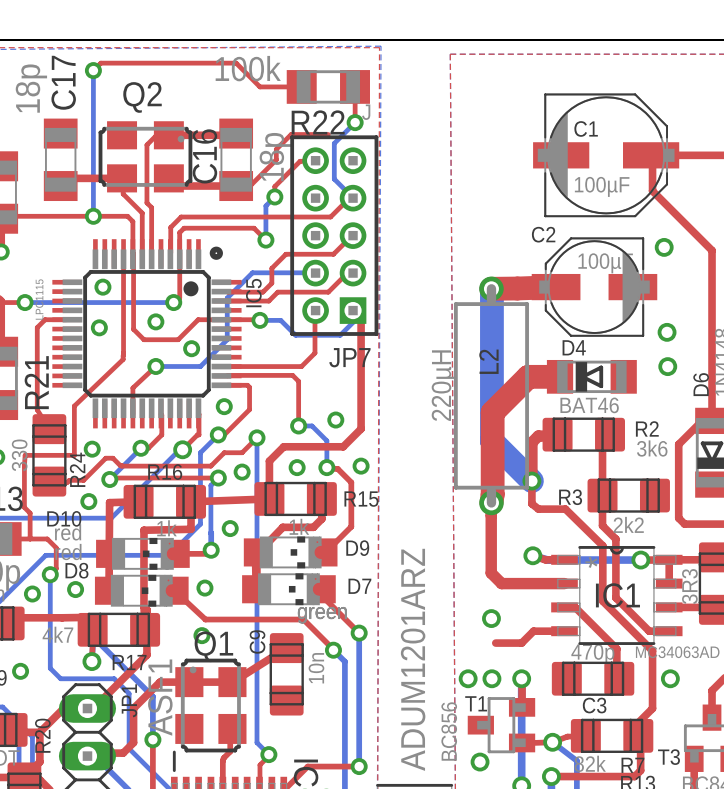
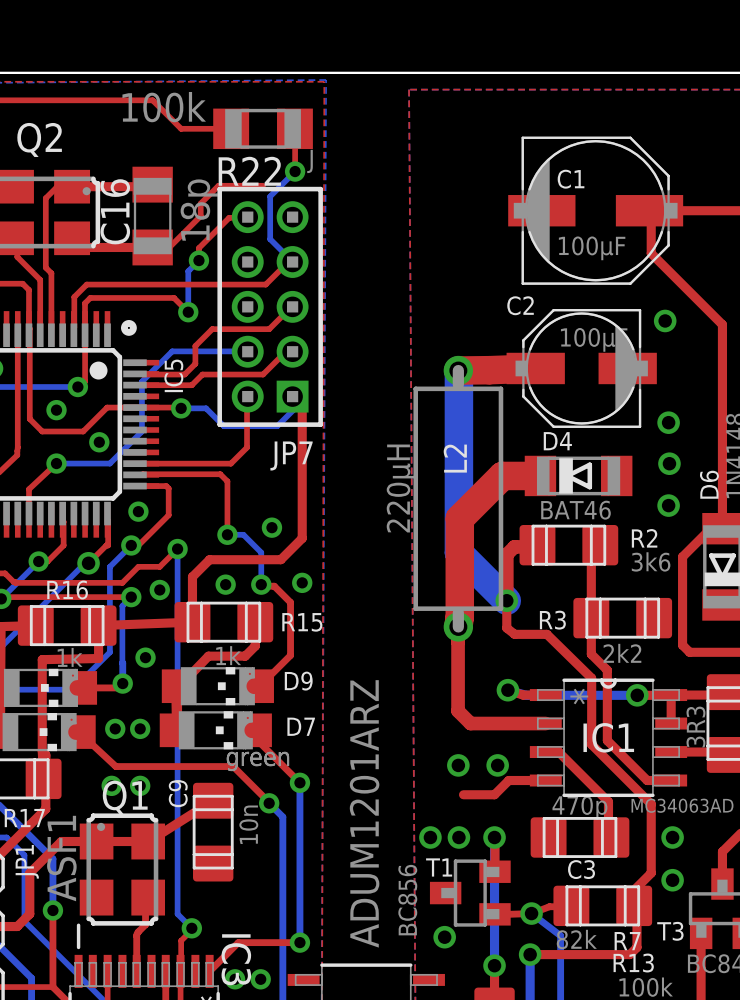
via: none -> (668, 505)
via: none -> (140, 728)
via: none -> (497, 765)
via: none -> (140, 785)
via: none -> (672, 880)

